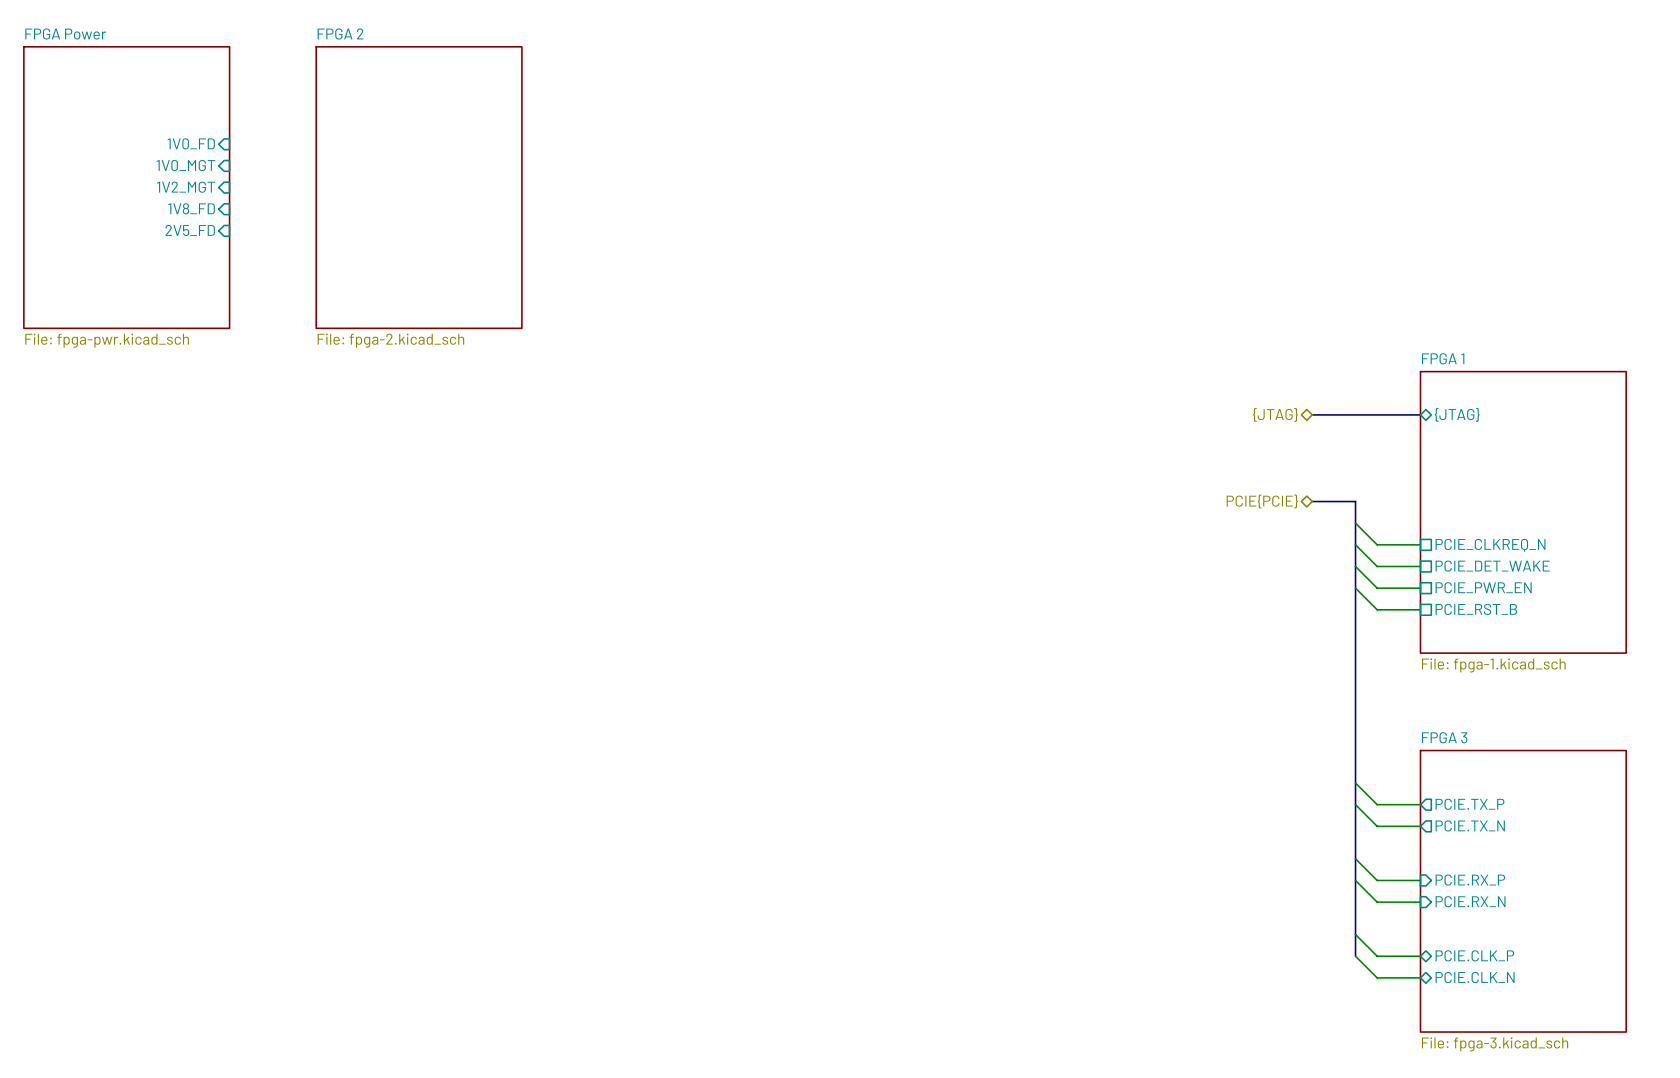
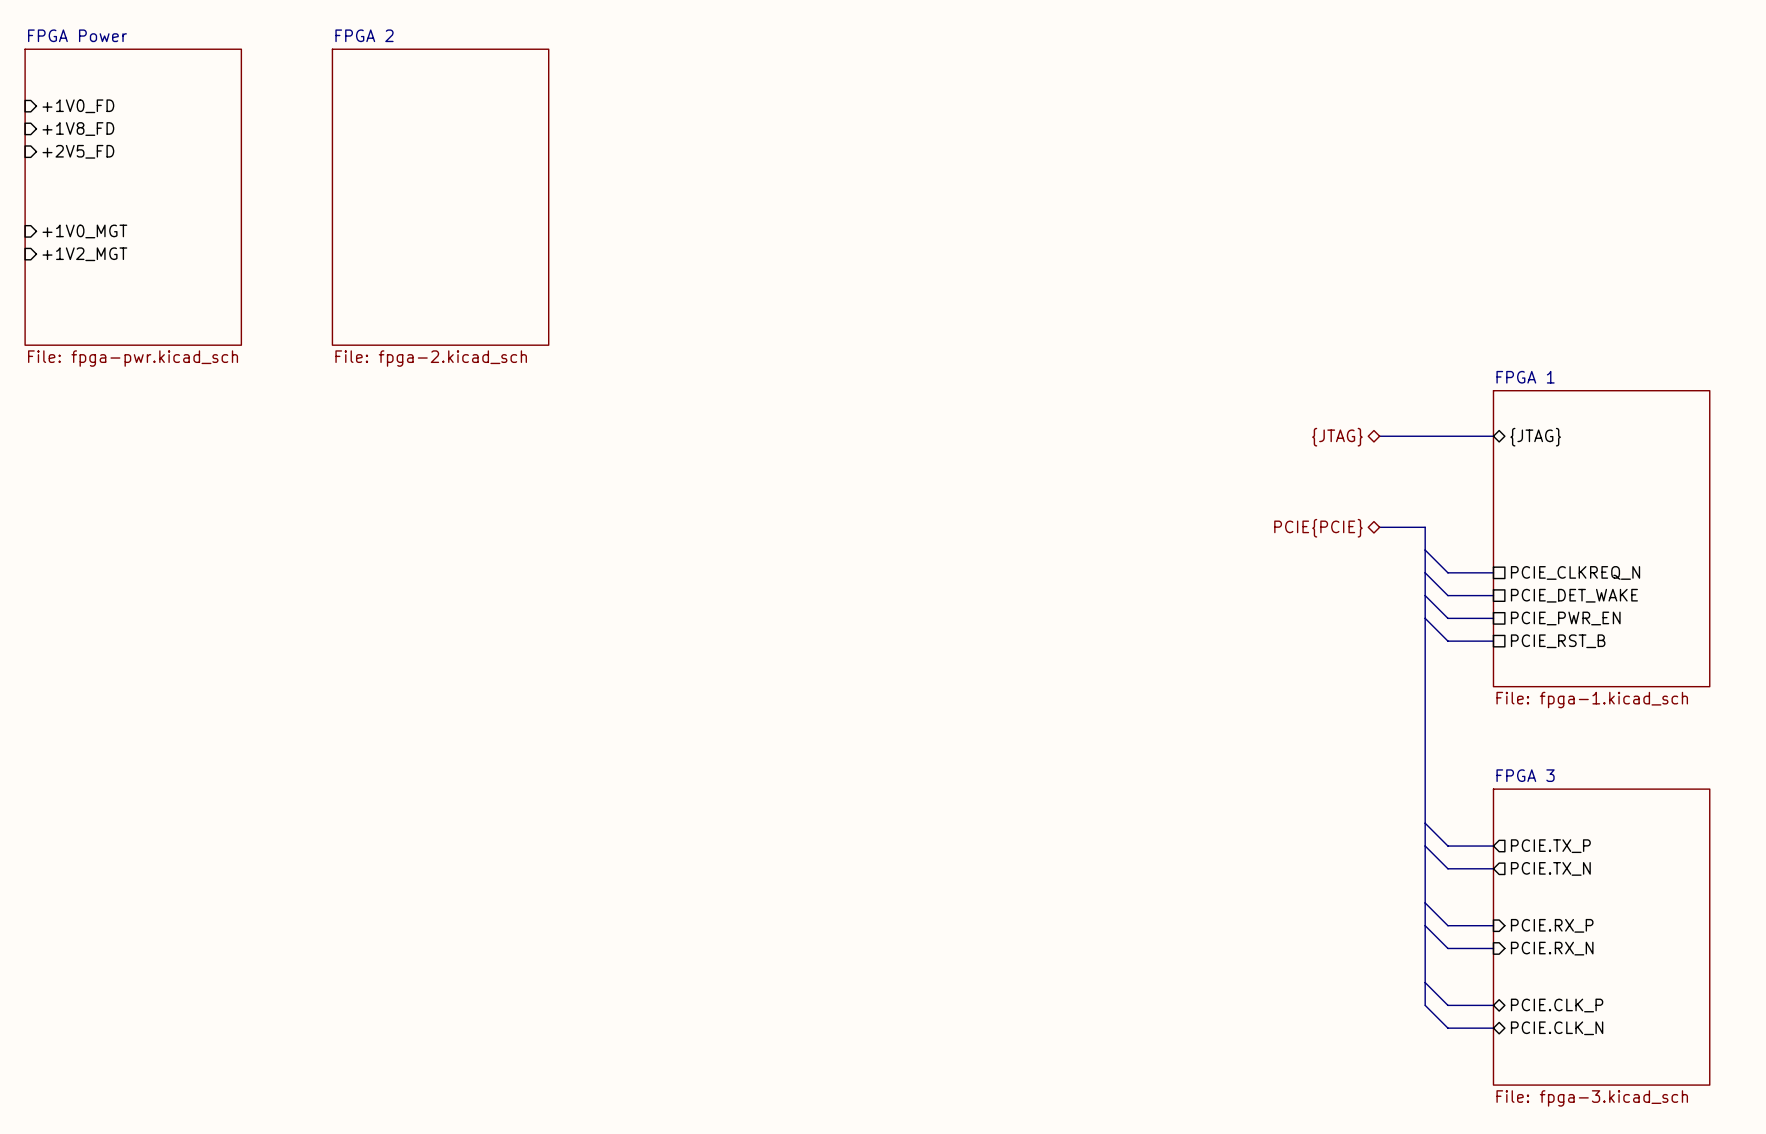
sheet pin: none -> +1V0_FD (78, 106)
sheet pin: none -> +1V8_FD (78, 129)
sheet pin: none -> +2V5_FD (78, 151)
sheet pin: 1V0_FD (191, 143) -> none
sheet pin: 1V0_MGT (185, 165) -> none
sheet pin: 1V2_MGT (186, 187) -> none
sheet pin: 1V8_FD (191, 208) -> none
sheet pin: none -> +1V0_MGT (84, 231)
sheet pin: 2V5_FD (190, 230) -> none
sheet pin: none -> +1V2_MGT (84, 254)

